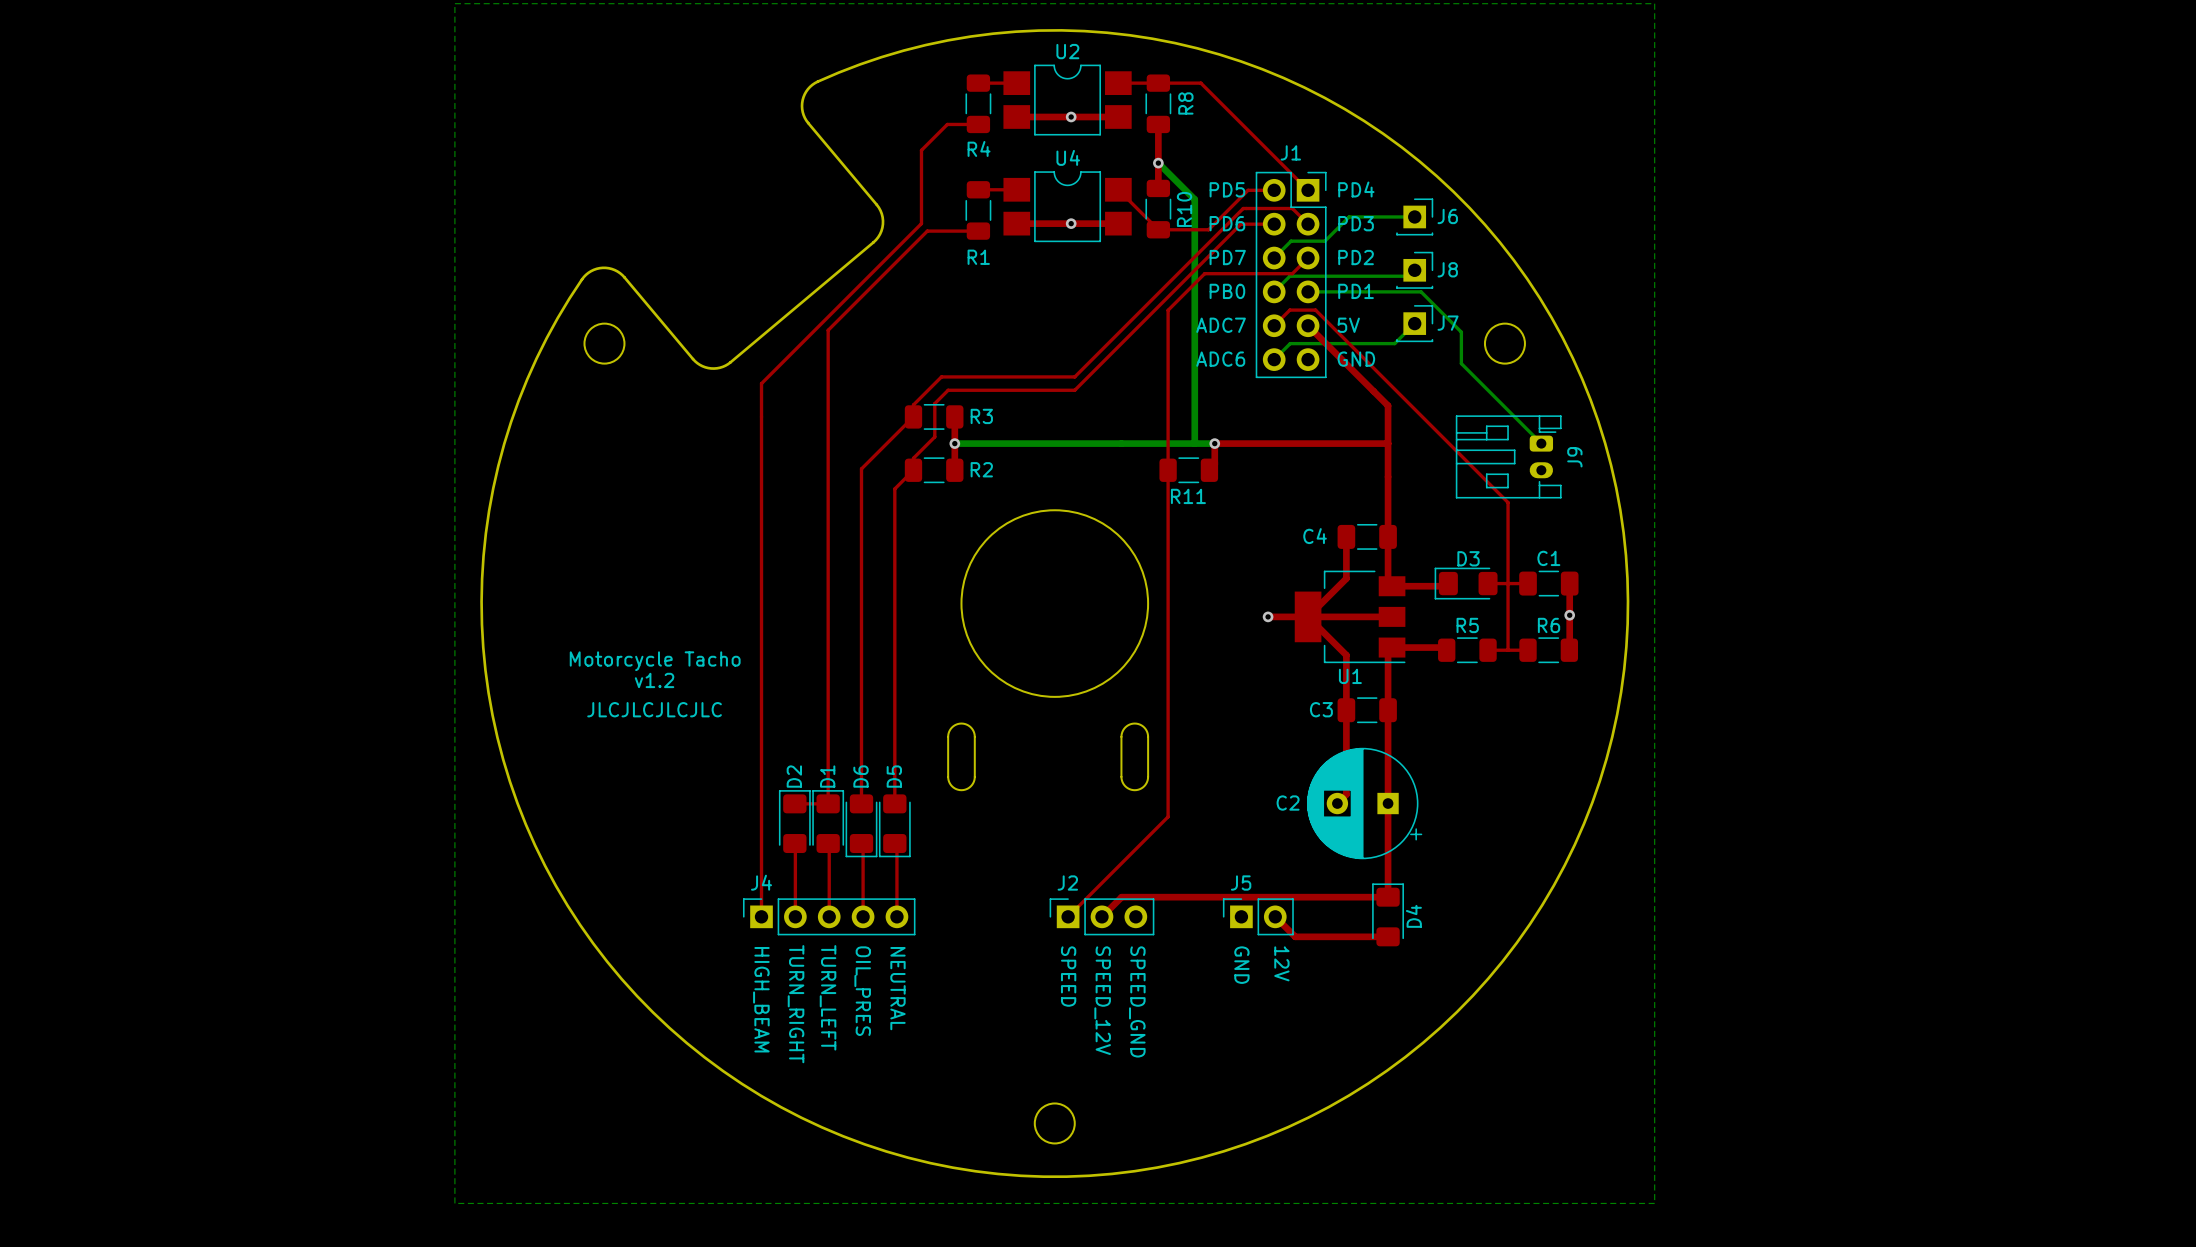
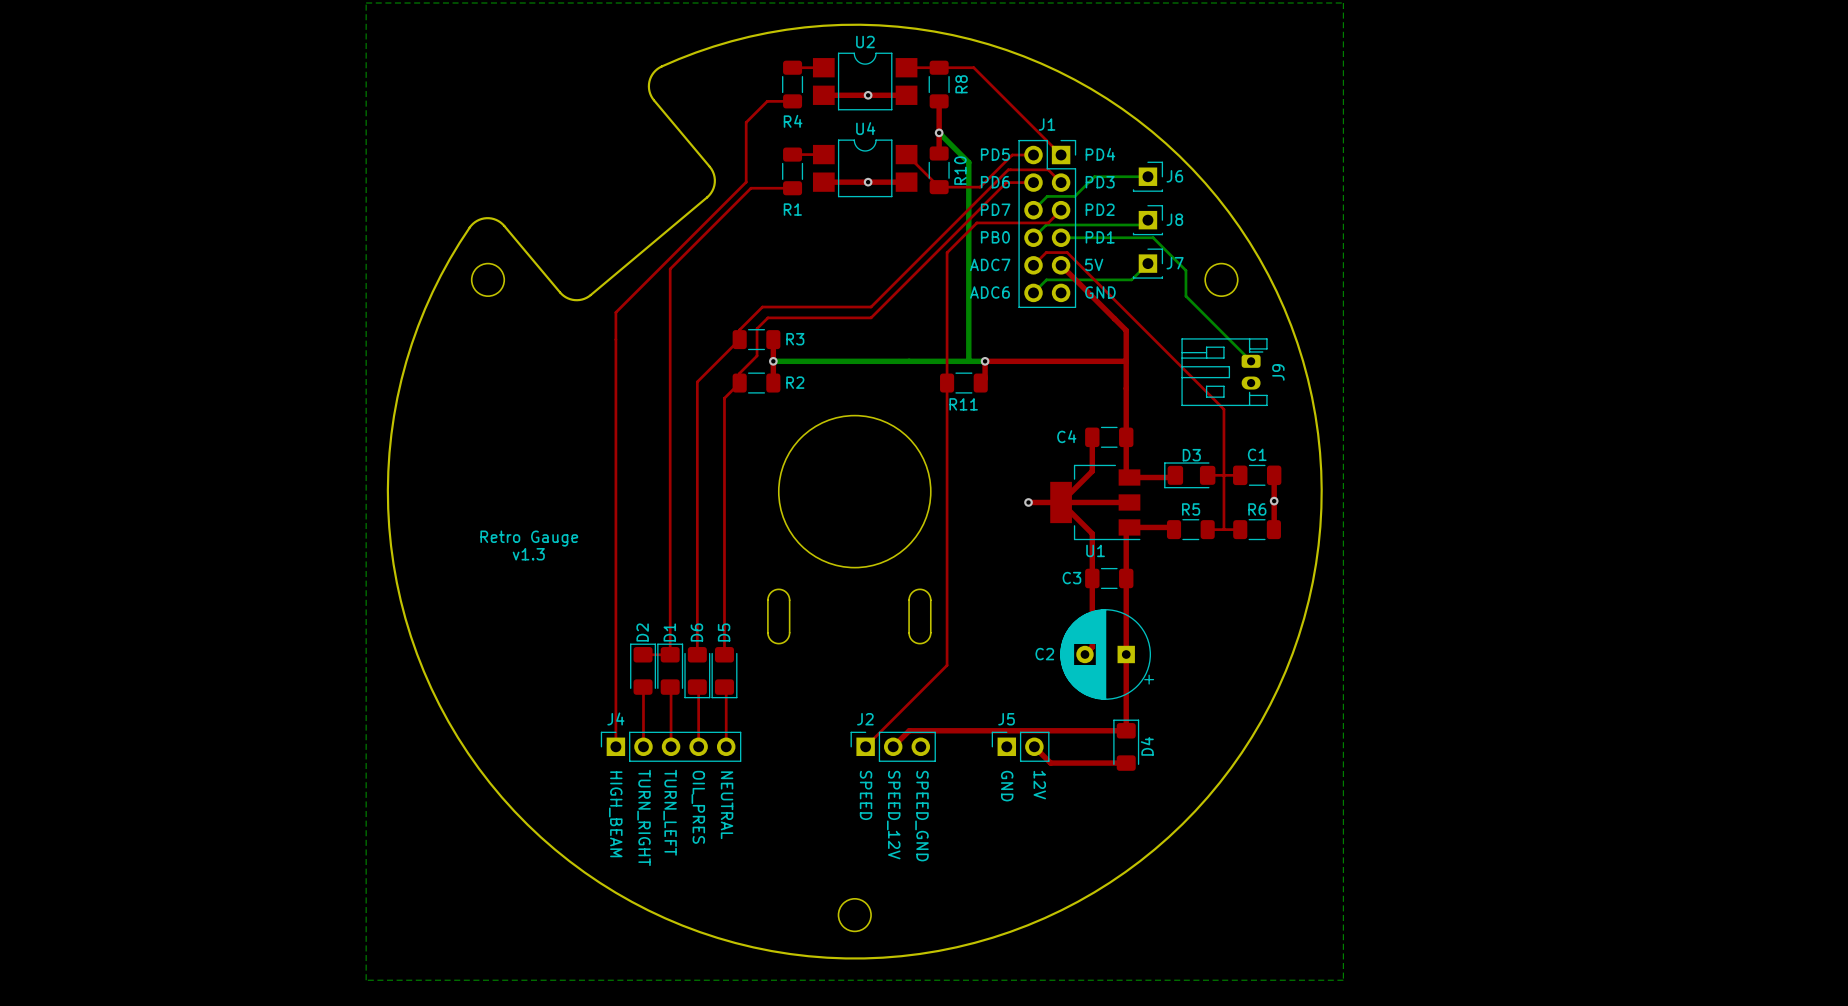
text: Motorcycle Tacho (655, 661) -> Retro Gauge (529, 538)
text: v1.2 (654, 680) -> v1.3 (528, 554)
text: JLCJLCJLCJLC (654, 709) -> none

